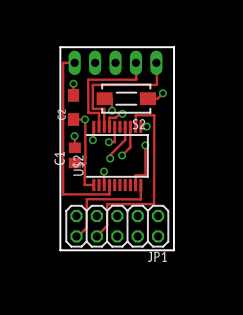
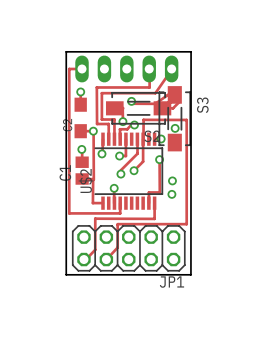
track: (156, 62) (156, 84) (141, 84) -> (171, 67) (155, 93)
track: none -> (174, 94) (168, 94) (155, 103) (133, 103) (131, 101)
via: none -> (131, 101)
via: (162, 93) -> none
S3: none -> (174, 118)
via: none -> (175, 128)
track: (135, 126) (135, 115) (154, 115) (154, 204) -> (143, 139) (143, 119) (186, 119) (186, 224) (169, 224)
via: none -> (172, 180)
via: none -> (171, 194)

